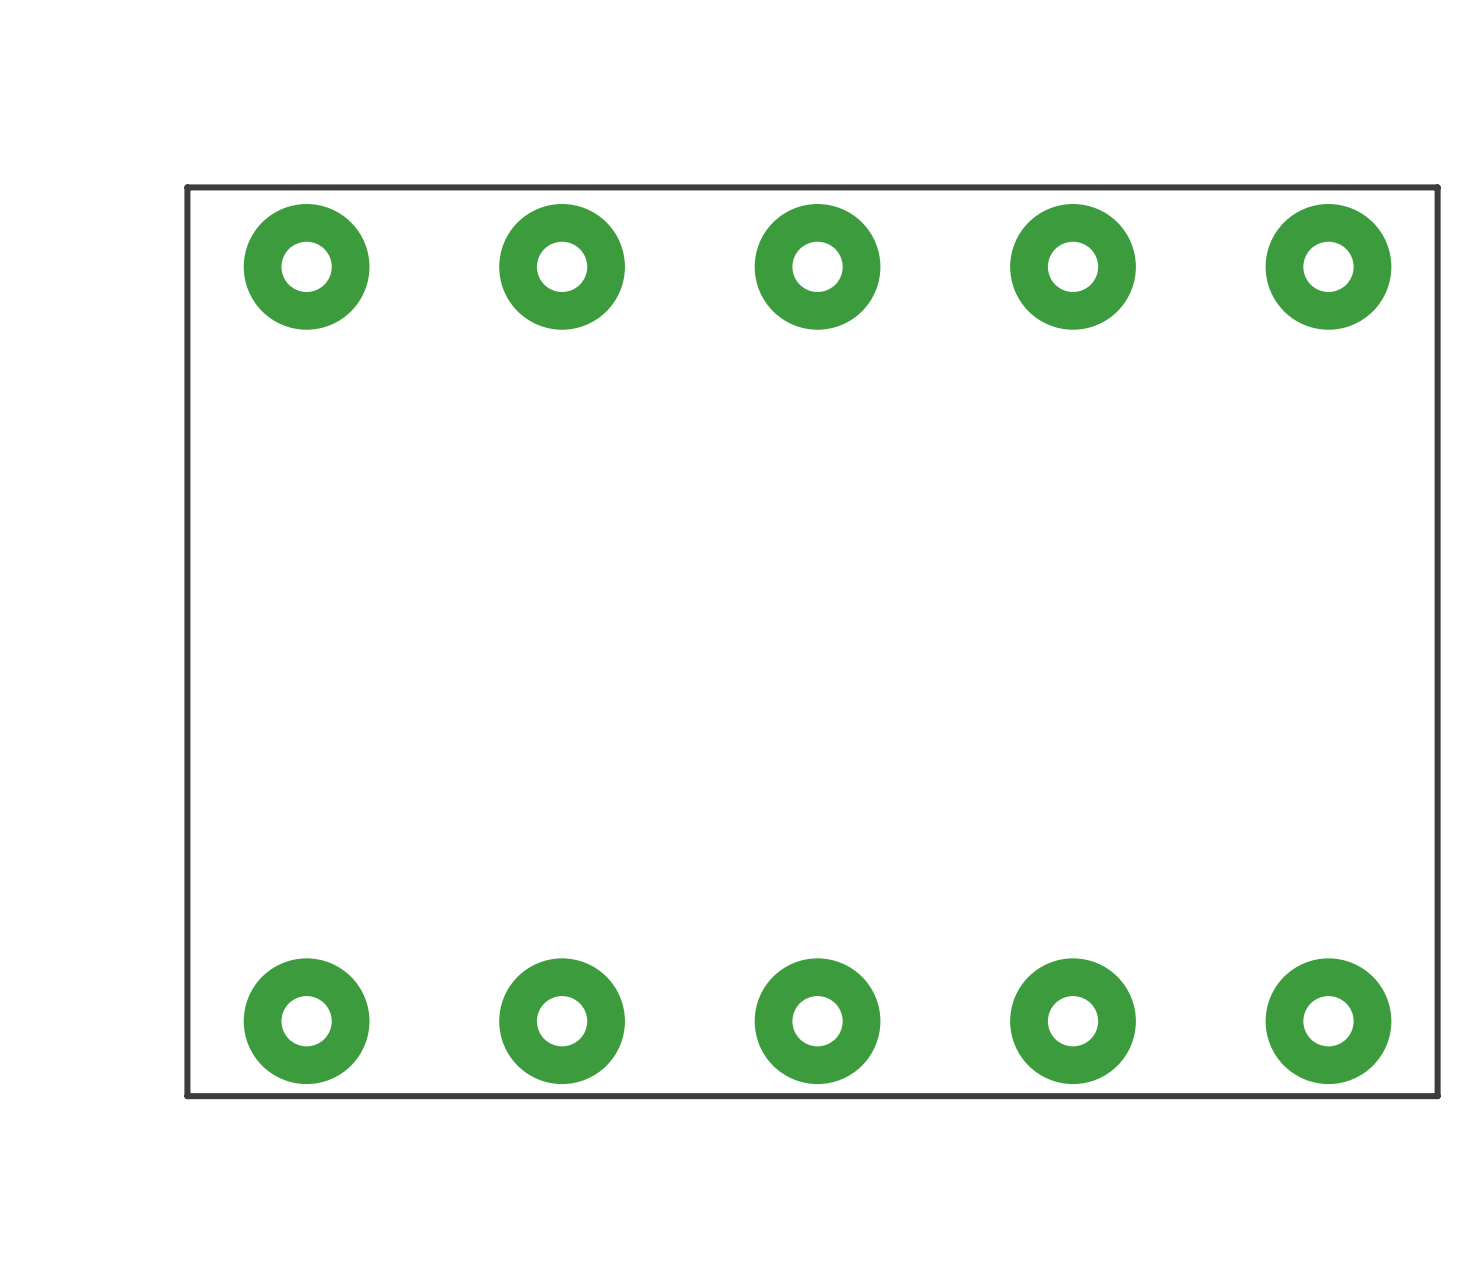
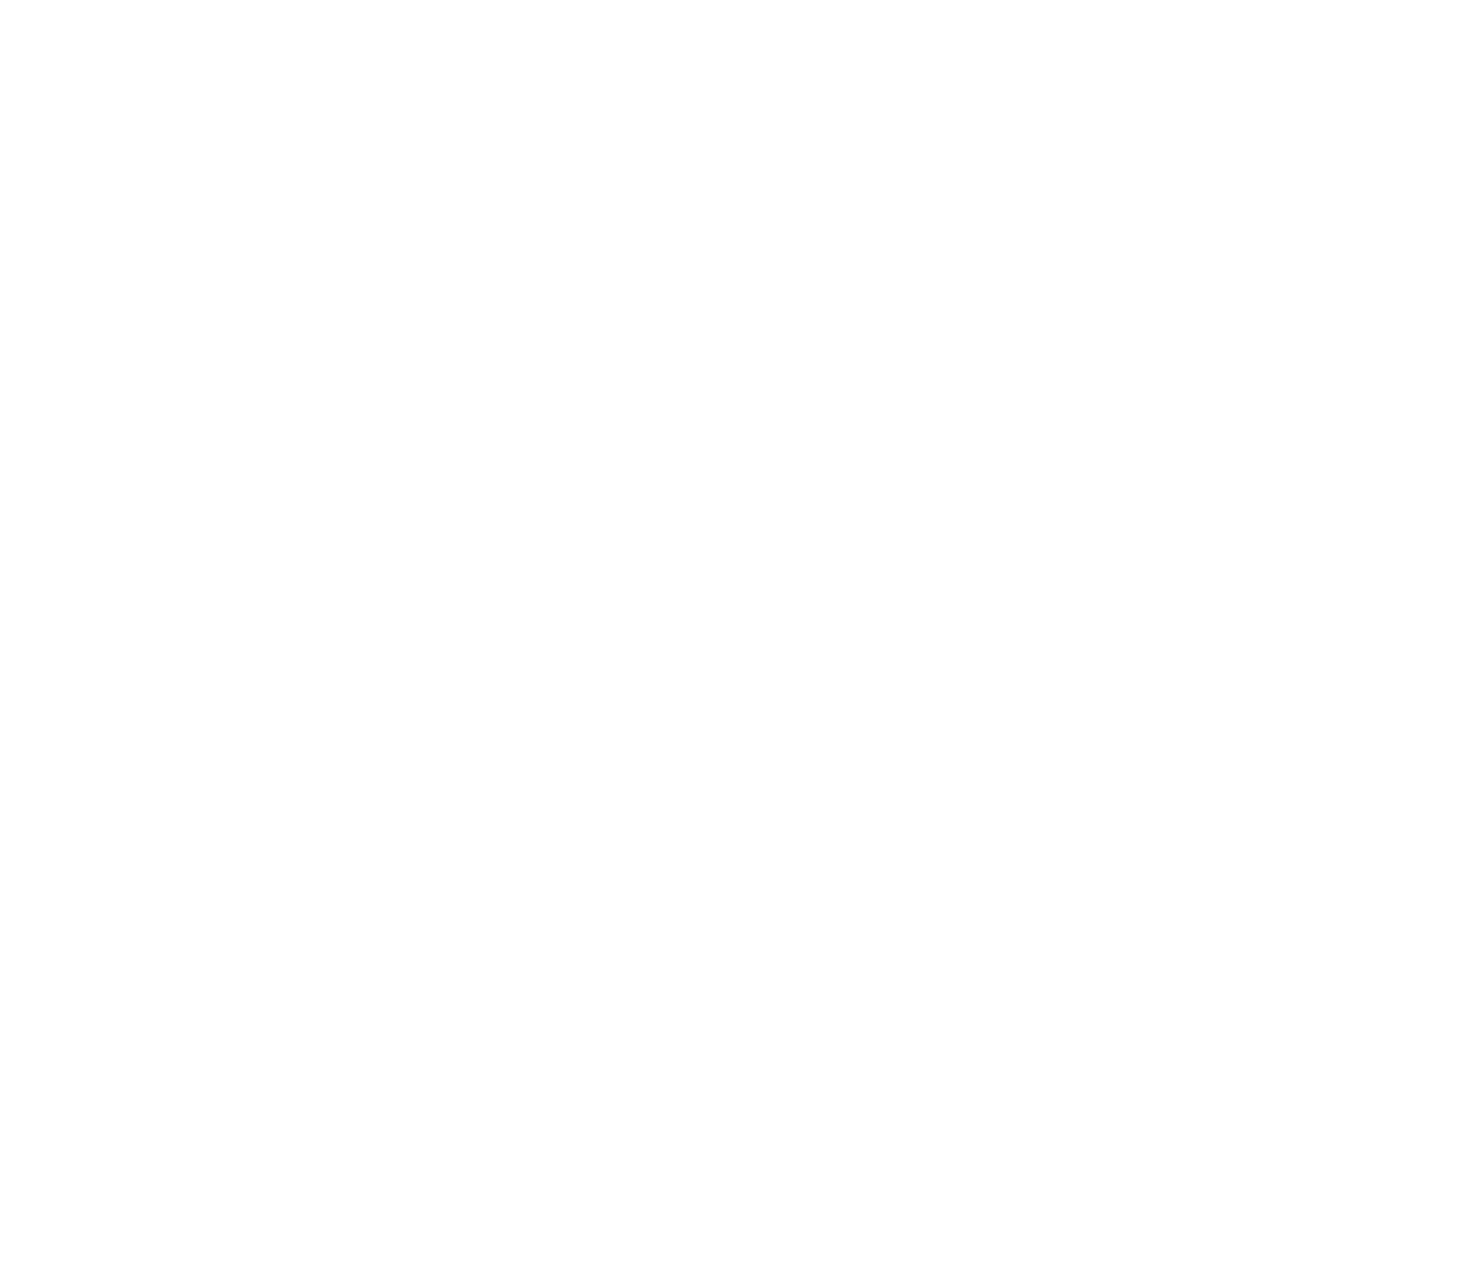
part: (812, 641) -> none

